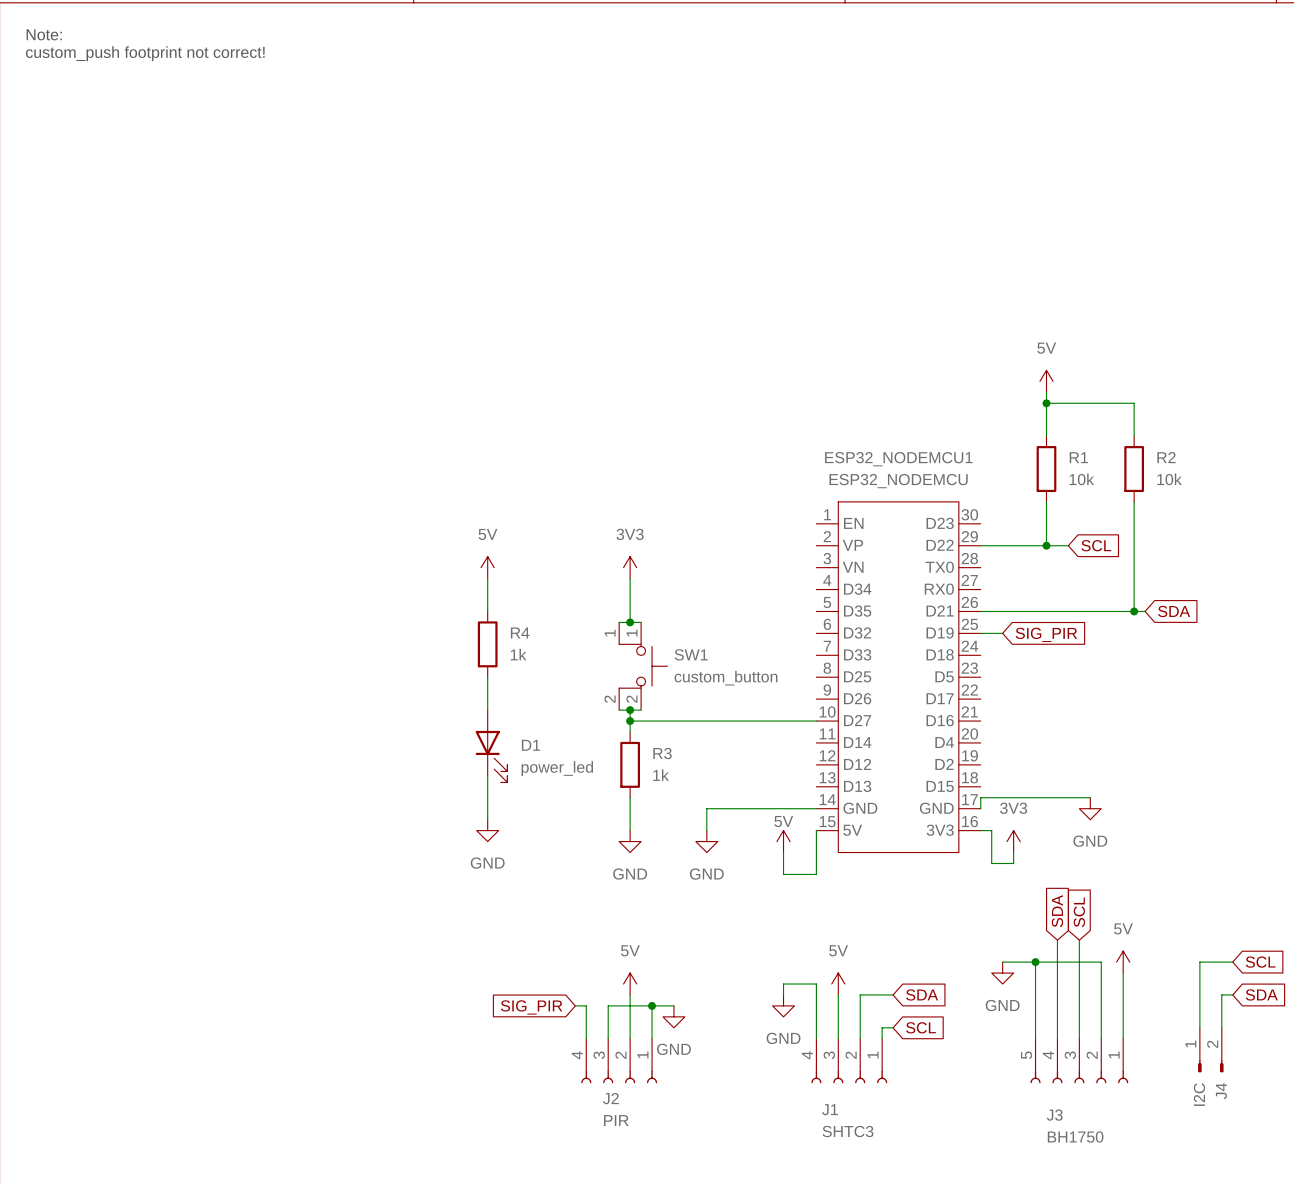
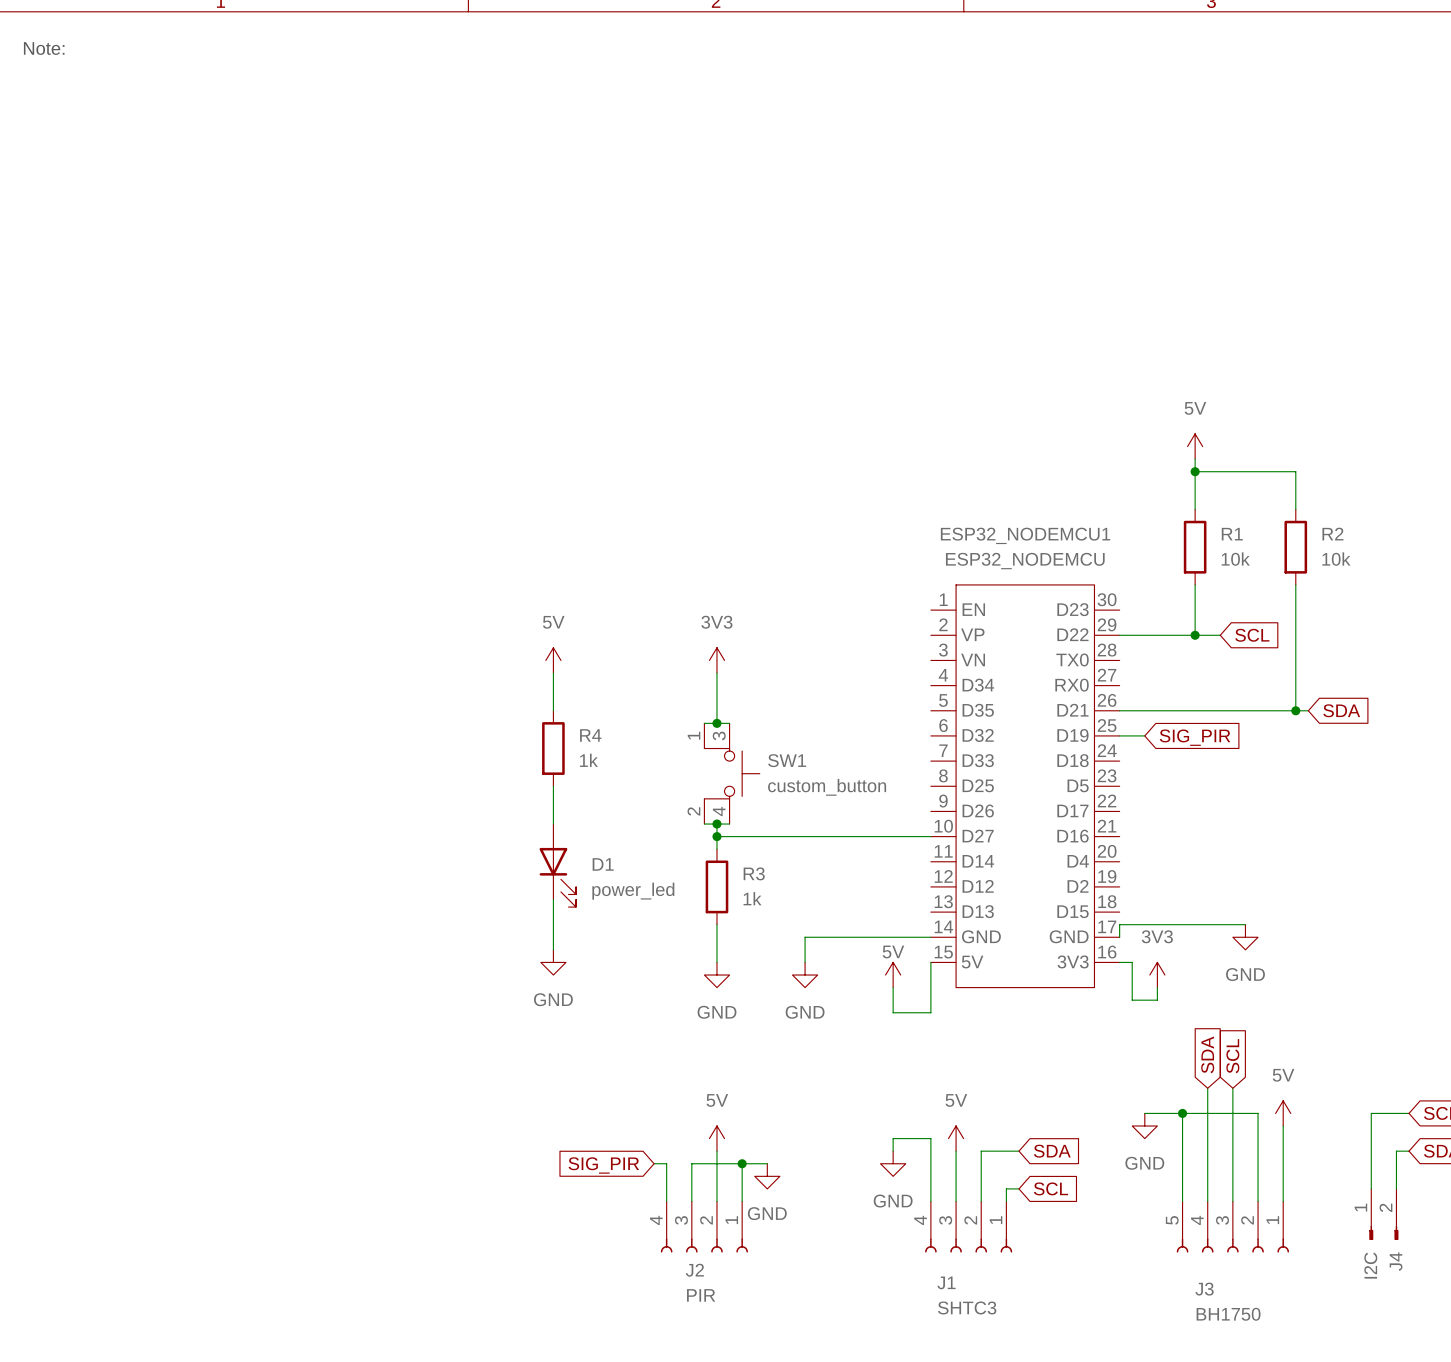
text: custom_push footprint not correct! (145, 53) -> none
SW1 pin number: 1 (632, 633) -> 3 (719, 735)
SW1 pin number: 2 (631, 699) -> 4 (719, 811)

